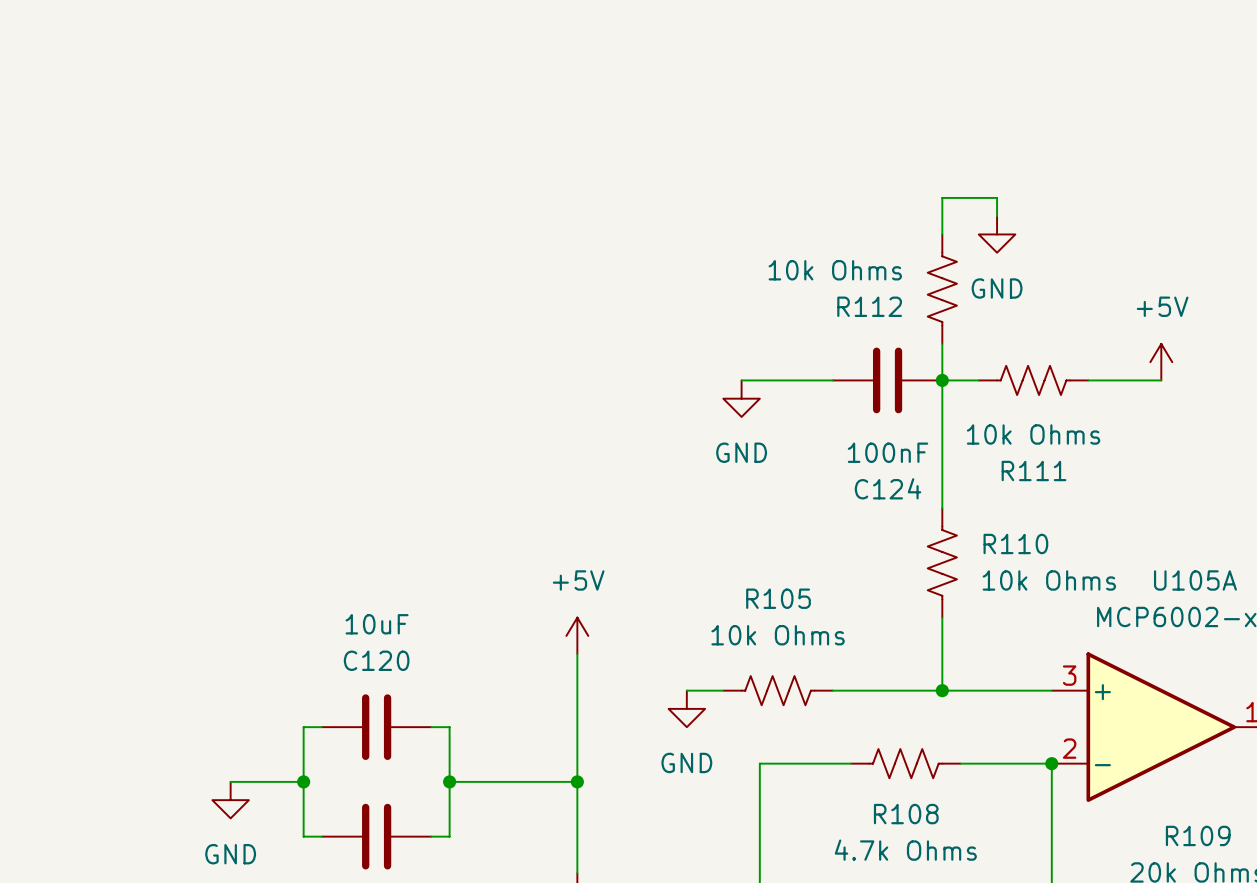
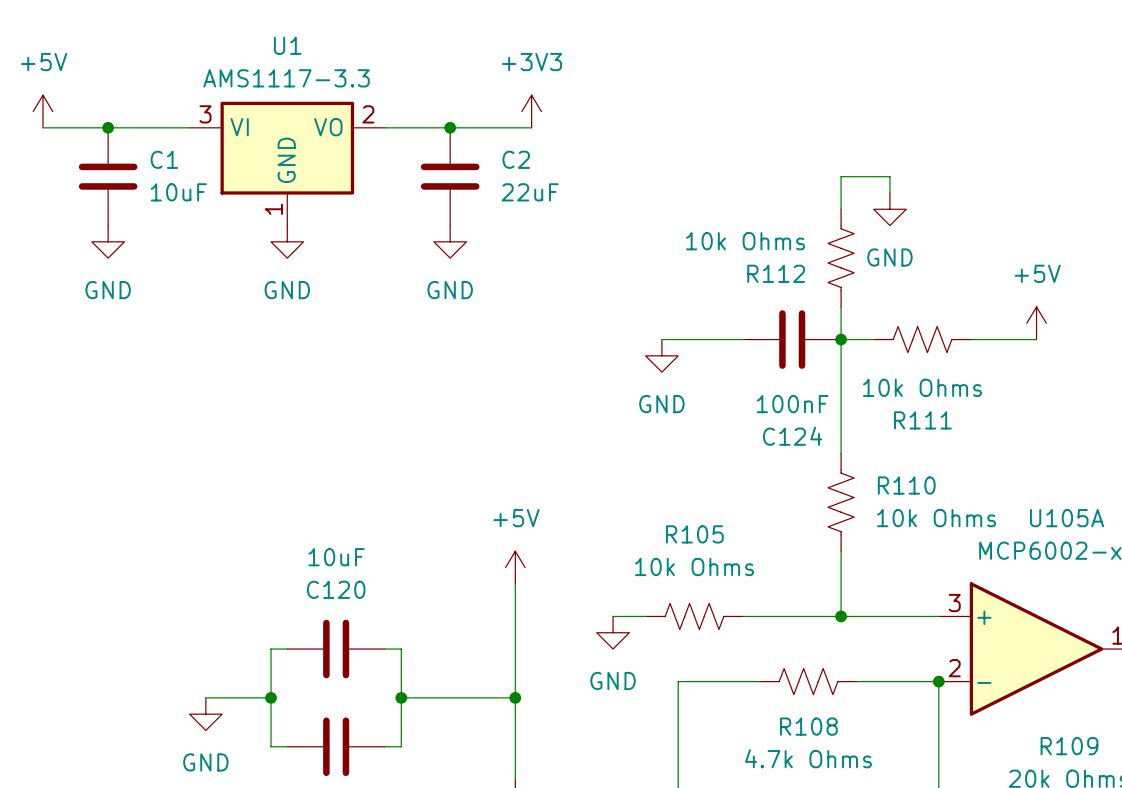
power symbol: none -> +5V (42, 111)
power symbol: none -> +3V3 (531, 111)
wire: none -> (42, 127) (189, 127)
junction: none -> (108, 127)
wire: none -> (385, 127) (531, 127)
junction: none -> (450, 127)
U1: none -> AMS1117-3.3 (287, 163)
C1: none -> 10uF (108, 176)
C2: none -> 22uF (450, 176)
power symbol: none -> GND (108, 241)
power symbol: none -> GND (287, 241)
power symbol: none -> GND (450, 241)

